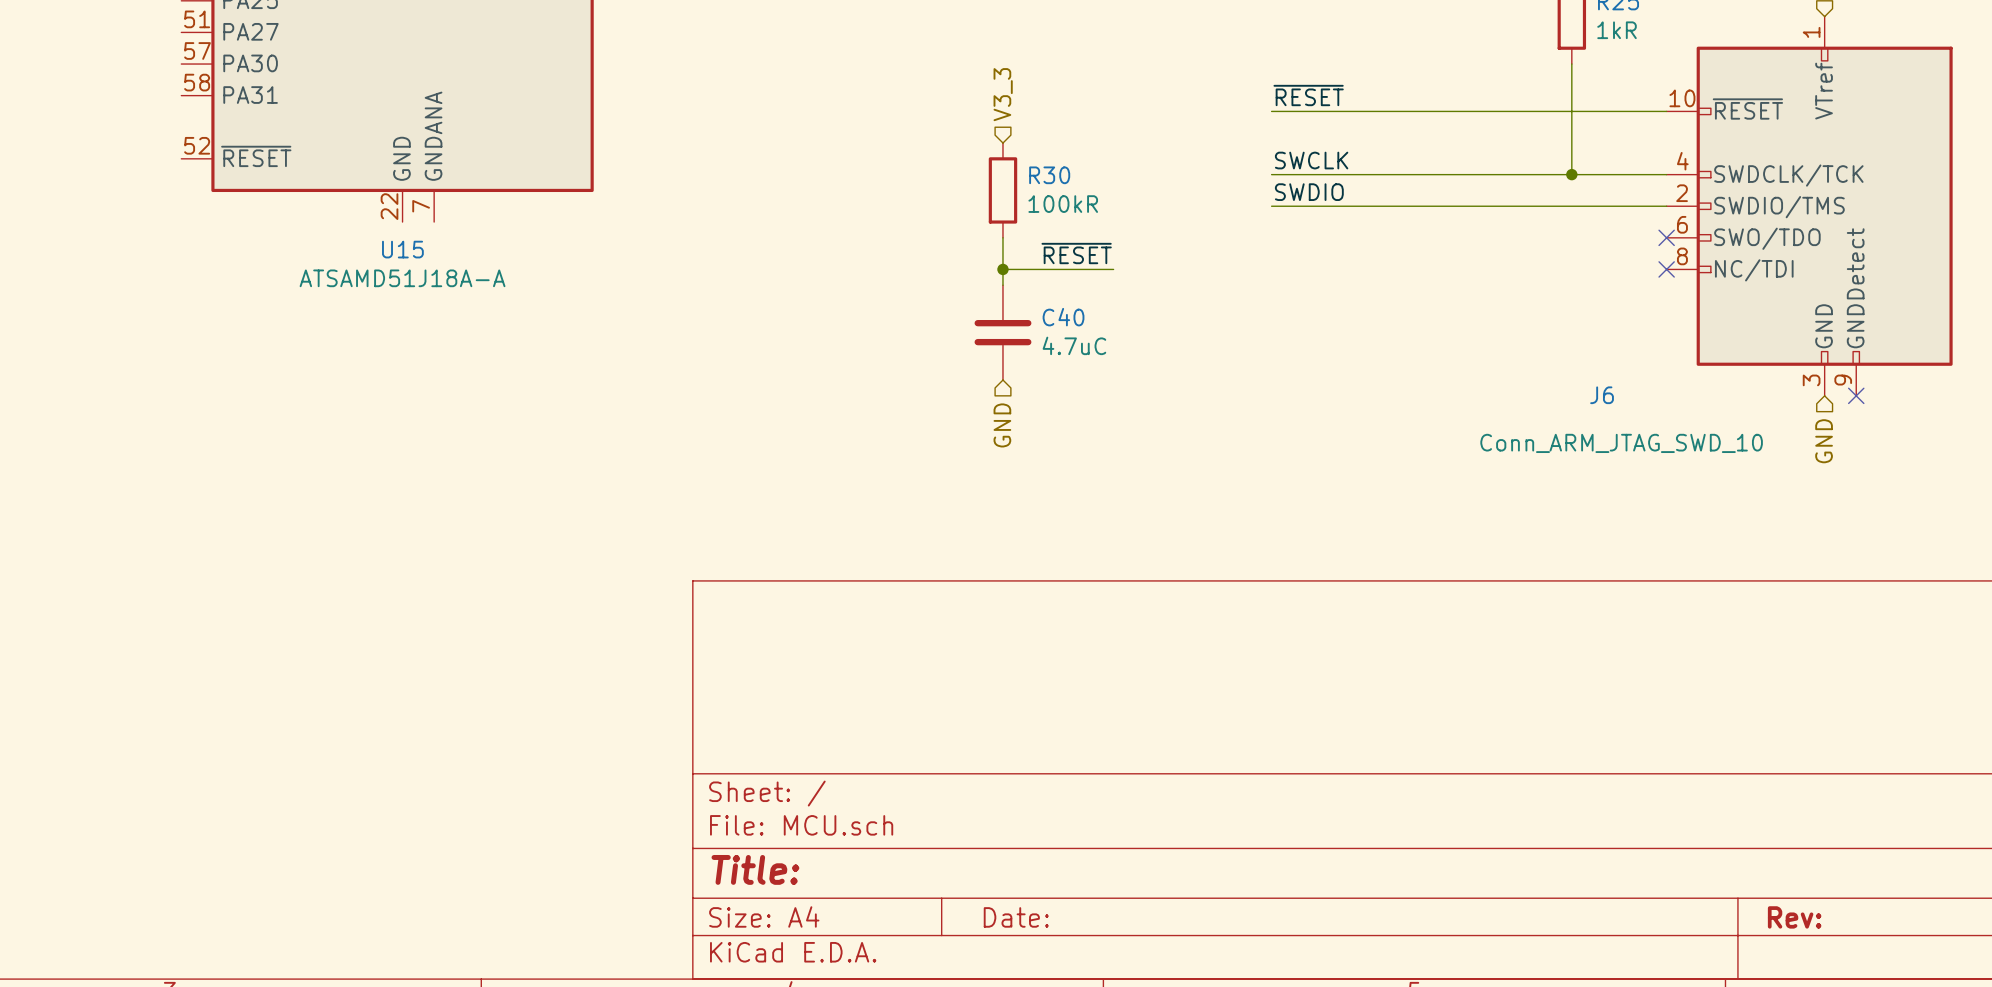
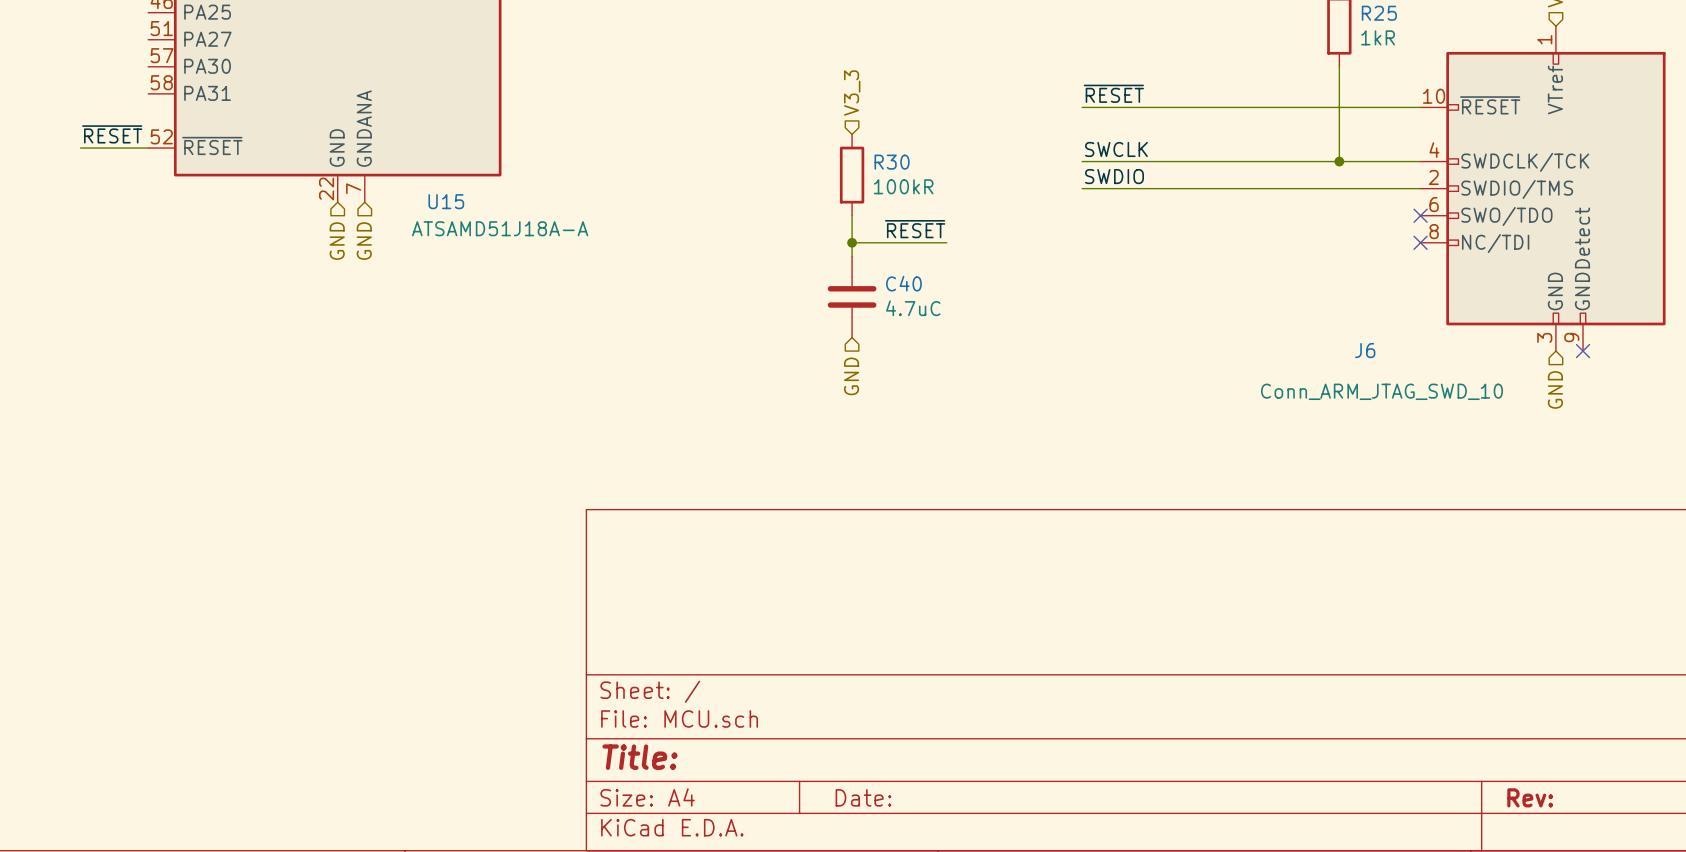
label: none -> ~{RESET} (112, 134)
wire: none -> (80, 148) (148, 148)
U15 name position: U15 (402, 249) -> U15 (446, 201)
hierarchical label: none -> GND (337, 241)
hierarchical label: none -> GND (364, 241)
U15 value position: ATSAMD51J18A-A (402, 278) -> ATSAMD51J18A-A (500, 228)

